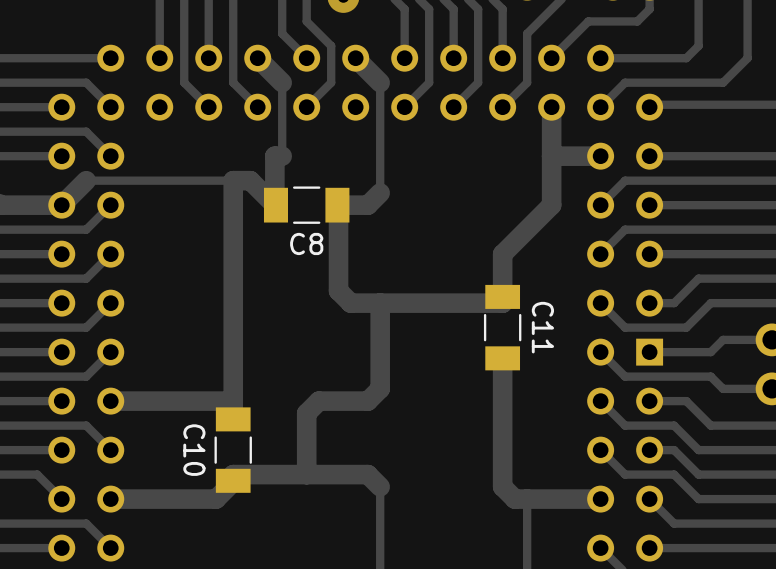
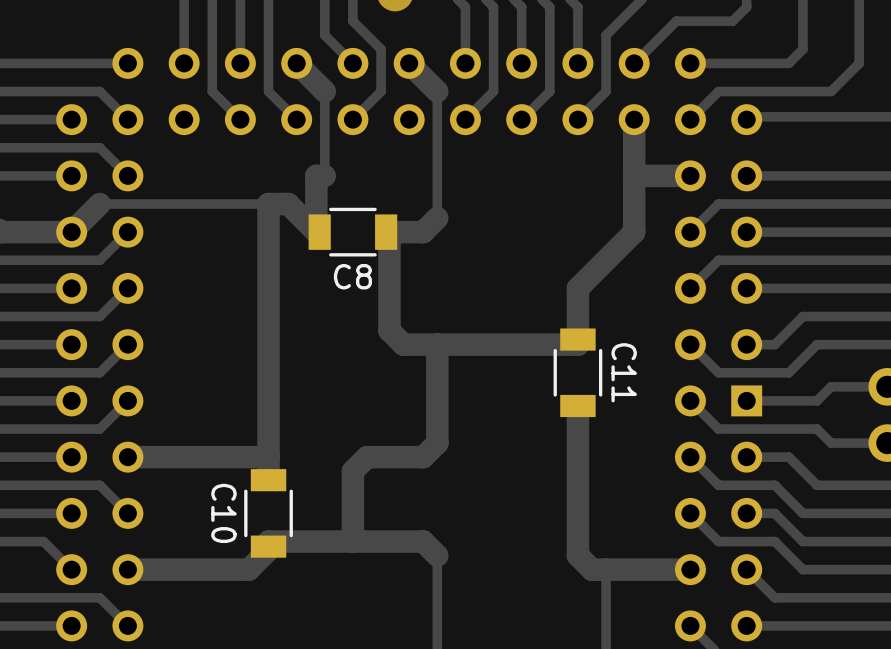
C8 footprint: [263, 186, 350, 224] -> [308, 207, 398, 257]
C11 footprint: [483, 284, 522, 371] -> [553, 328, 603, 418]
C10 footprint: [214, 407, 252, 493] -> [244, 469, 293, 558]

